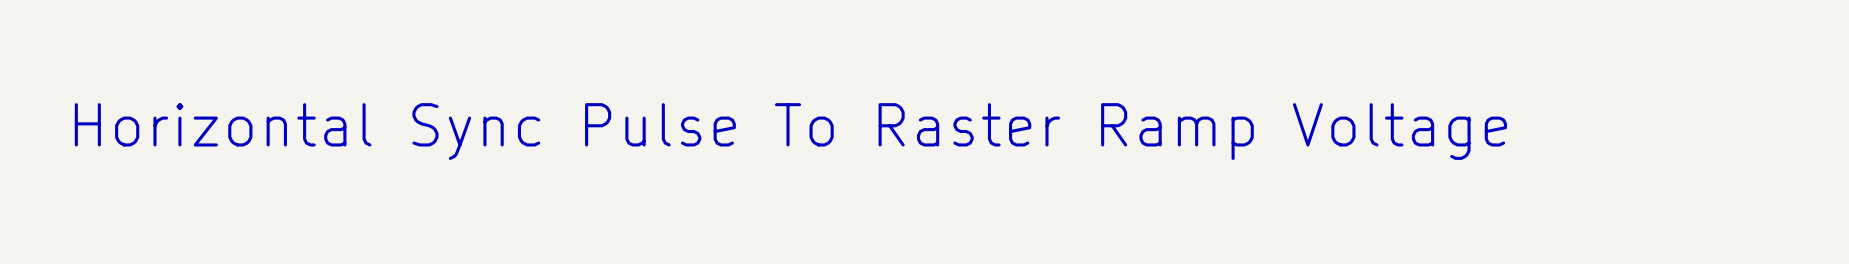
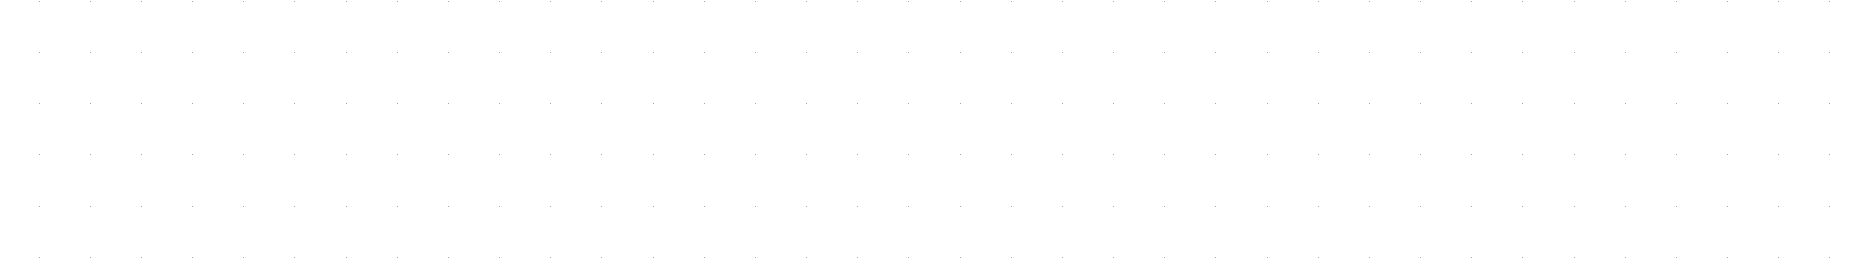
text: Horizontal Sync Pulse To Raster Ramp Voltage (790, 131) -> none

